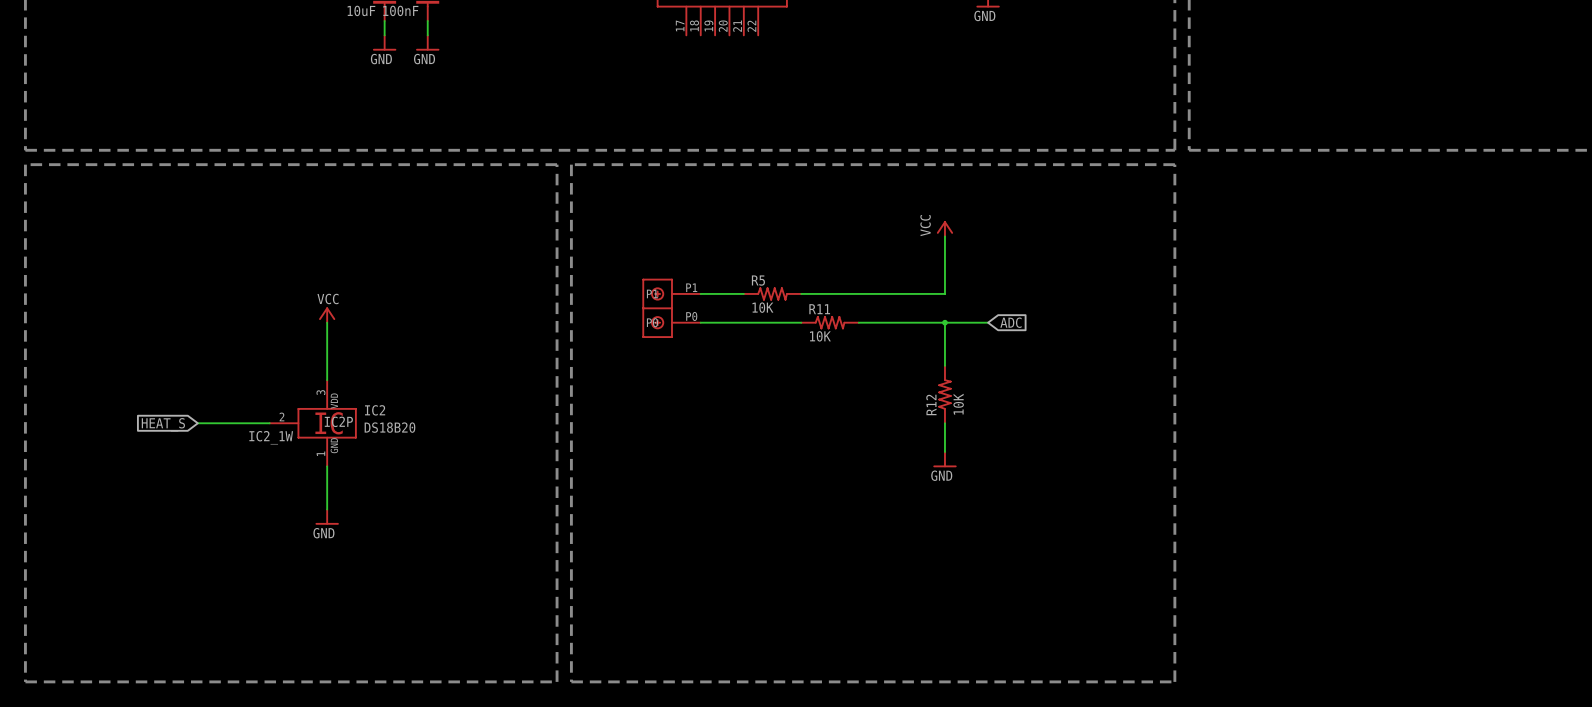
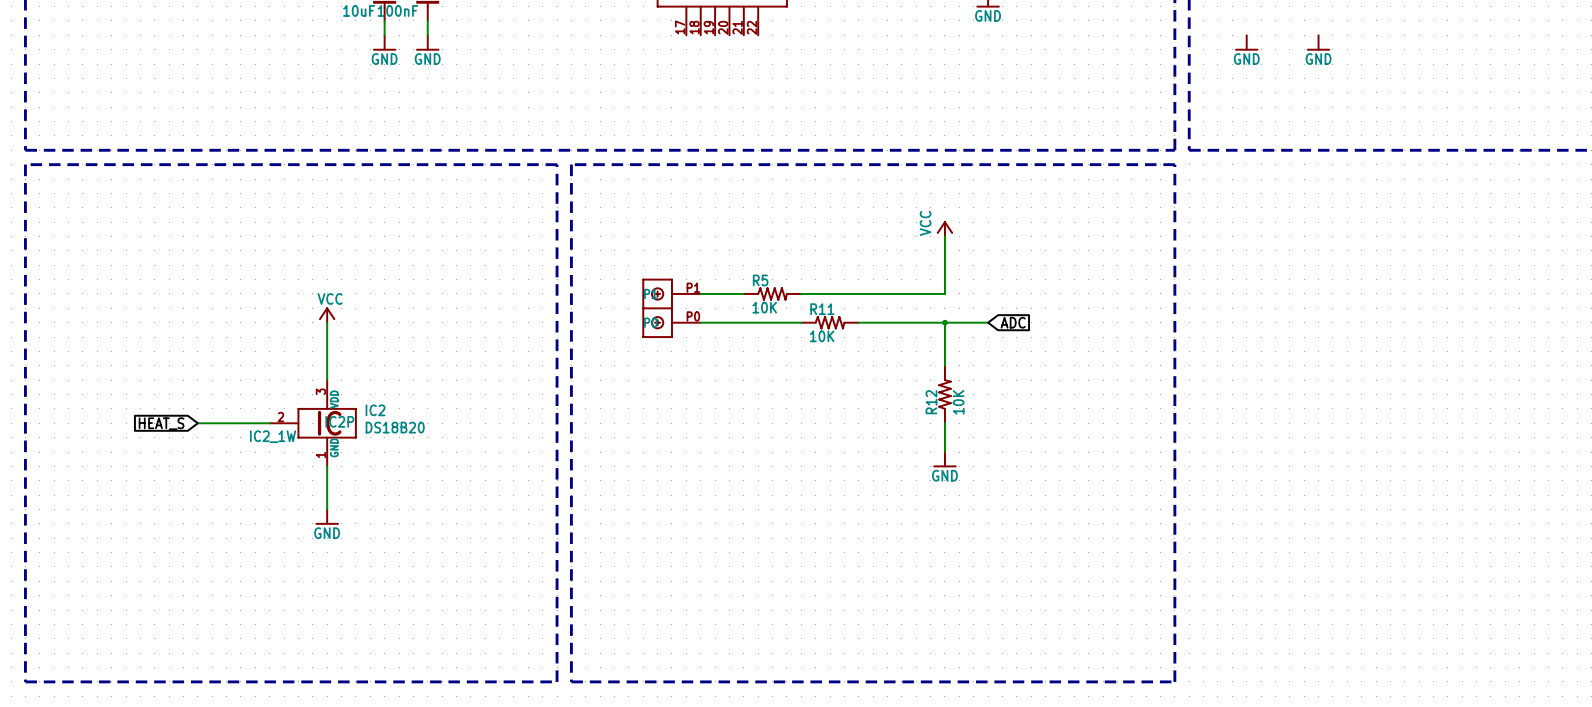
power symbol: none -> GND (1246, 42)
power symbol: none -> GND (1318, 42)

